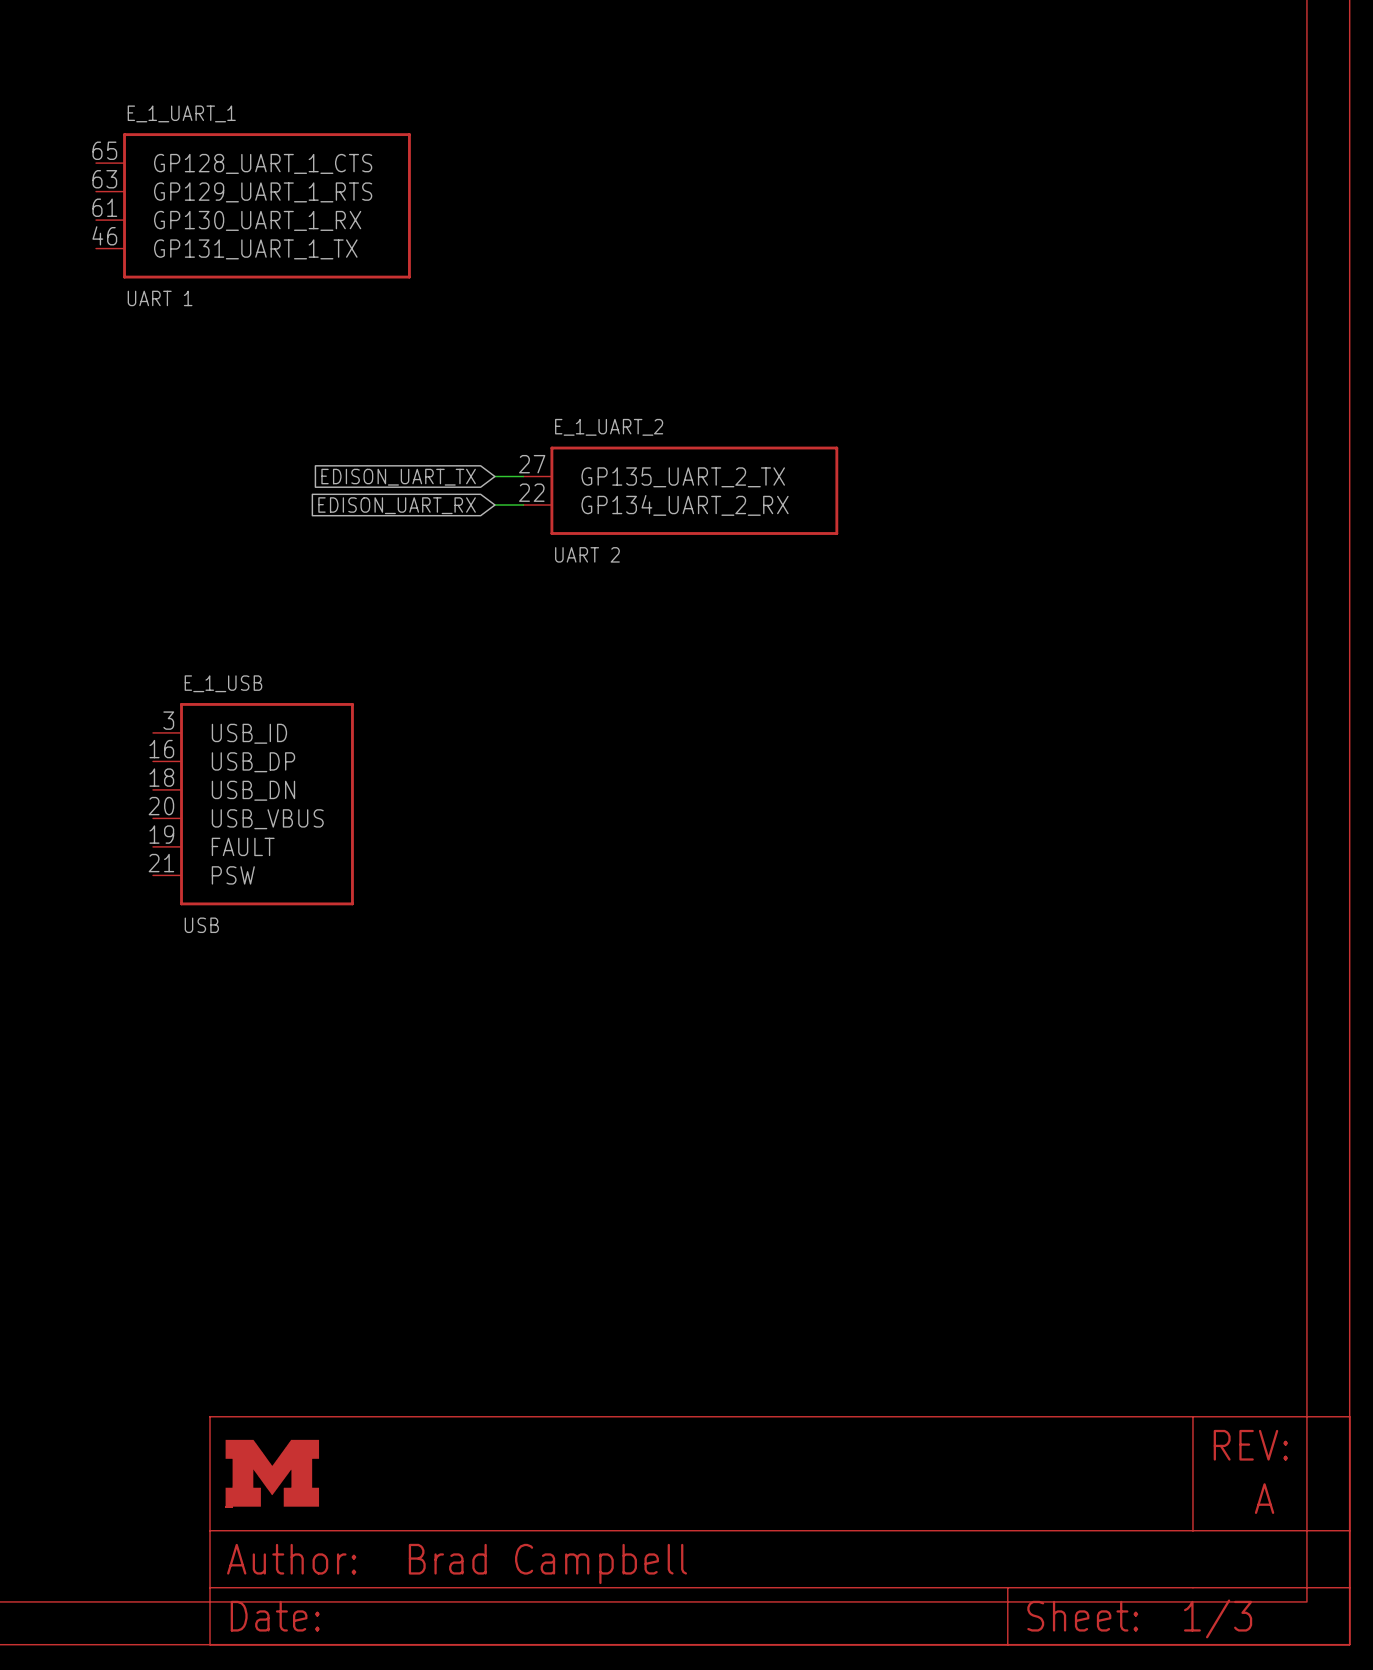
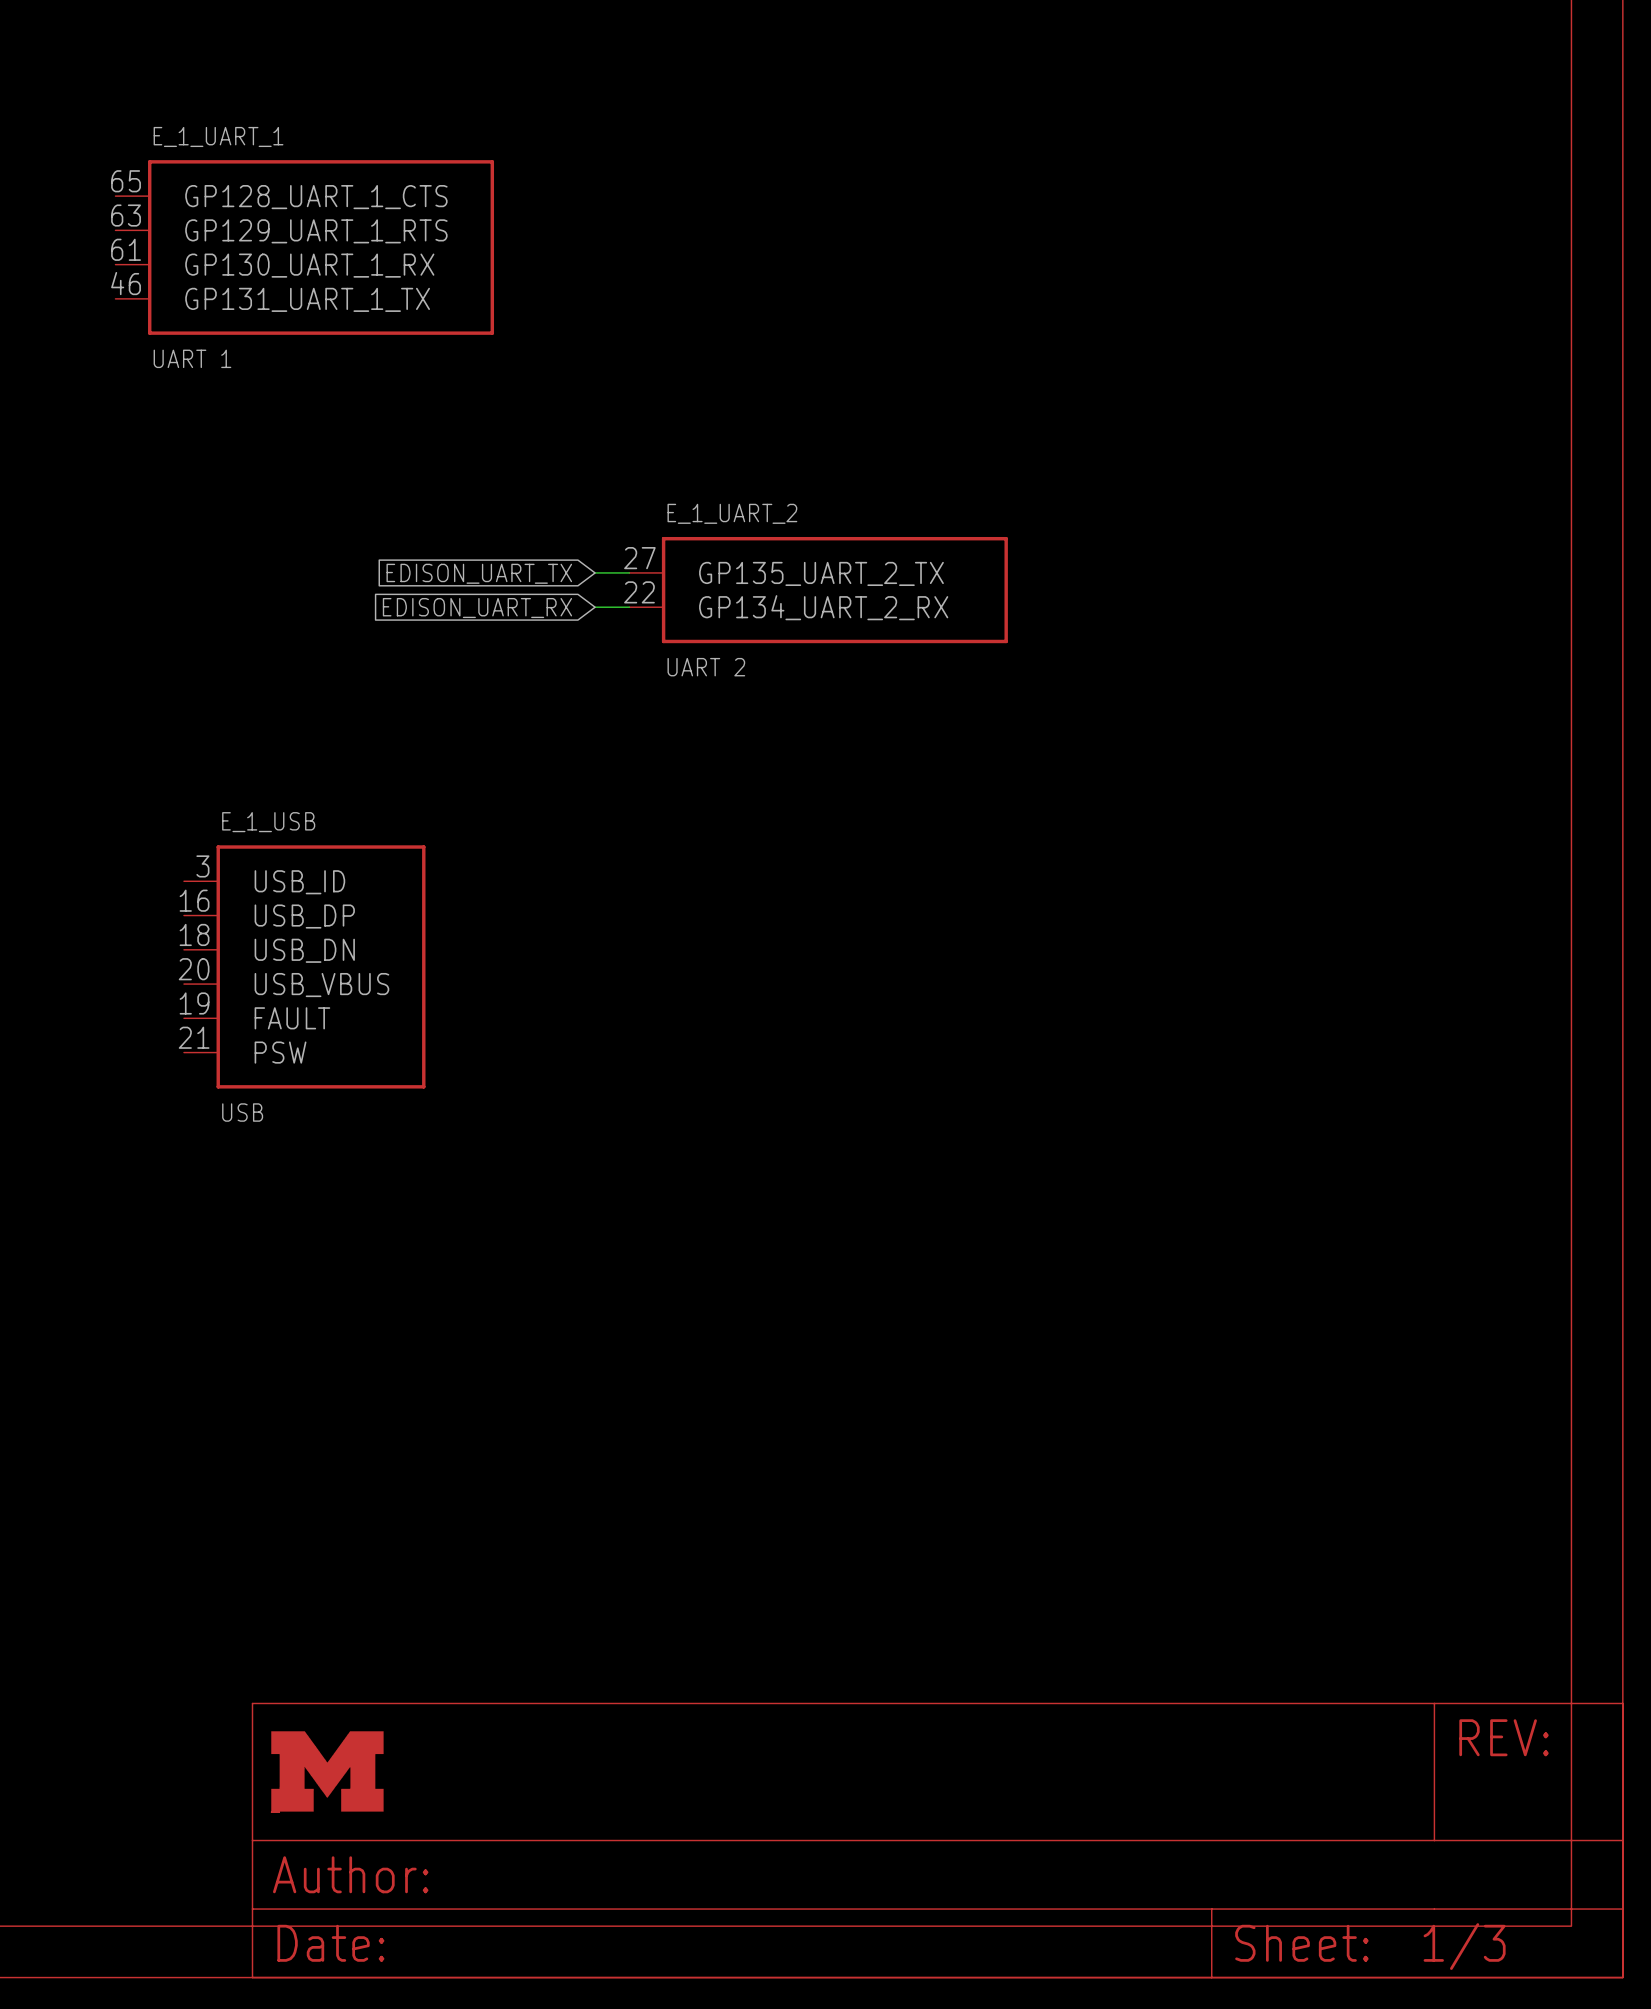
part text: A (1264, 1498) -> none
part text: Brad Campbell (547, 1563) -> none

